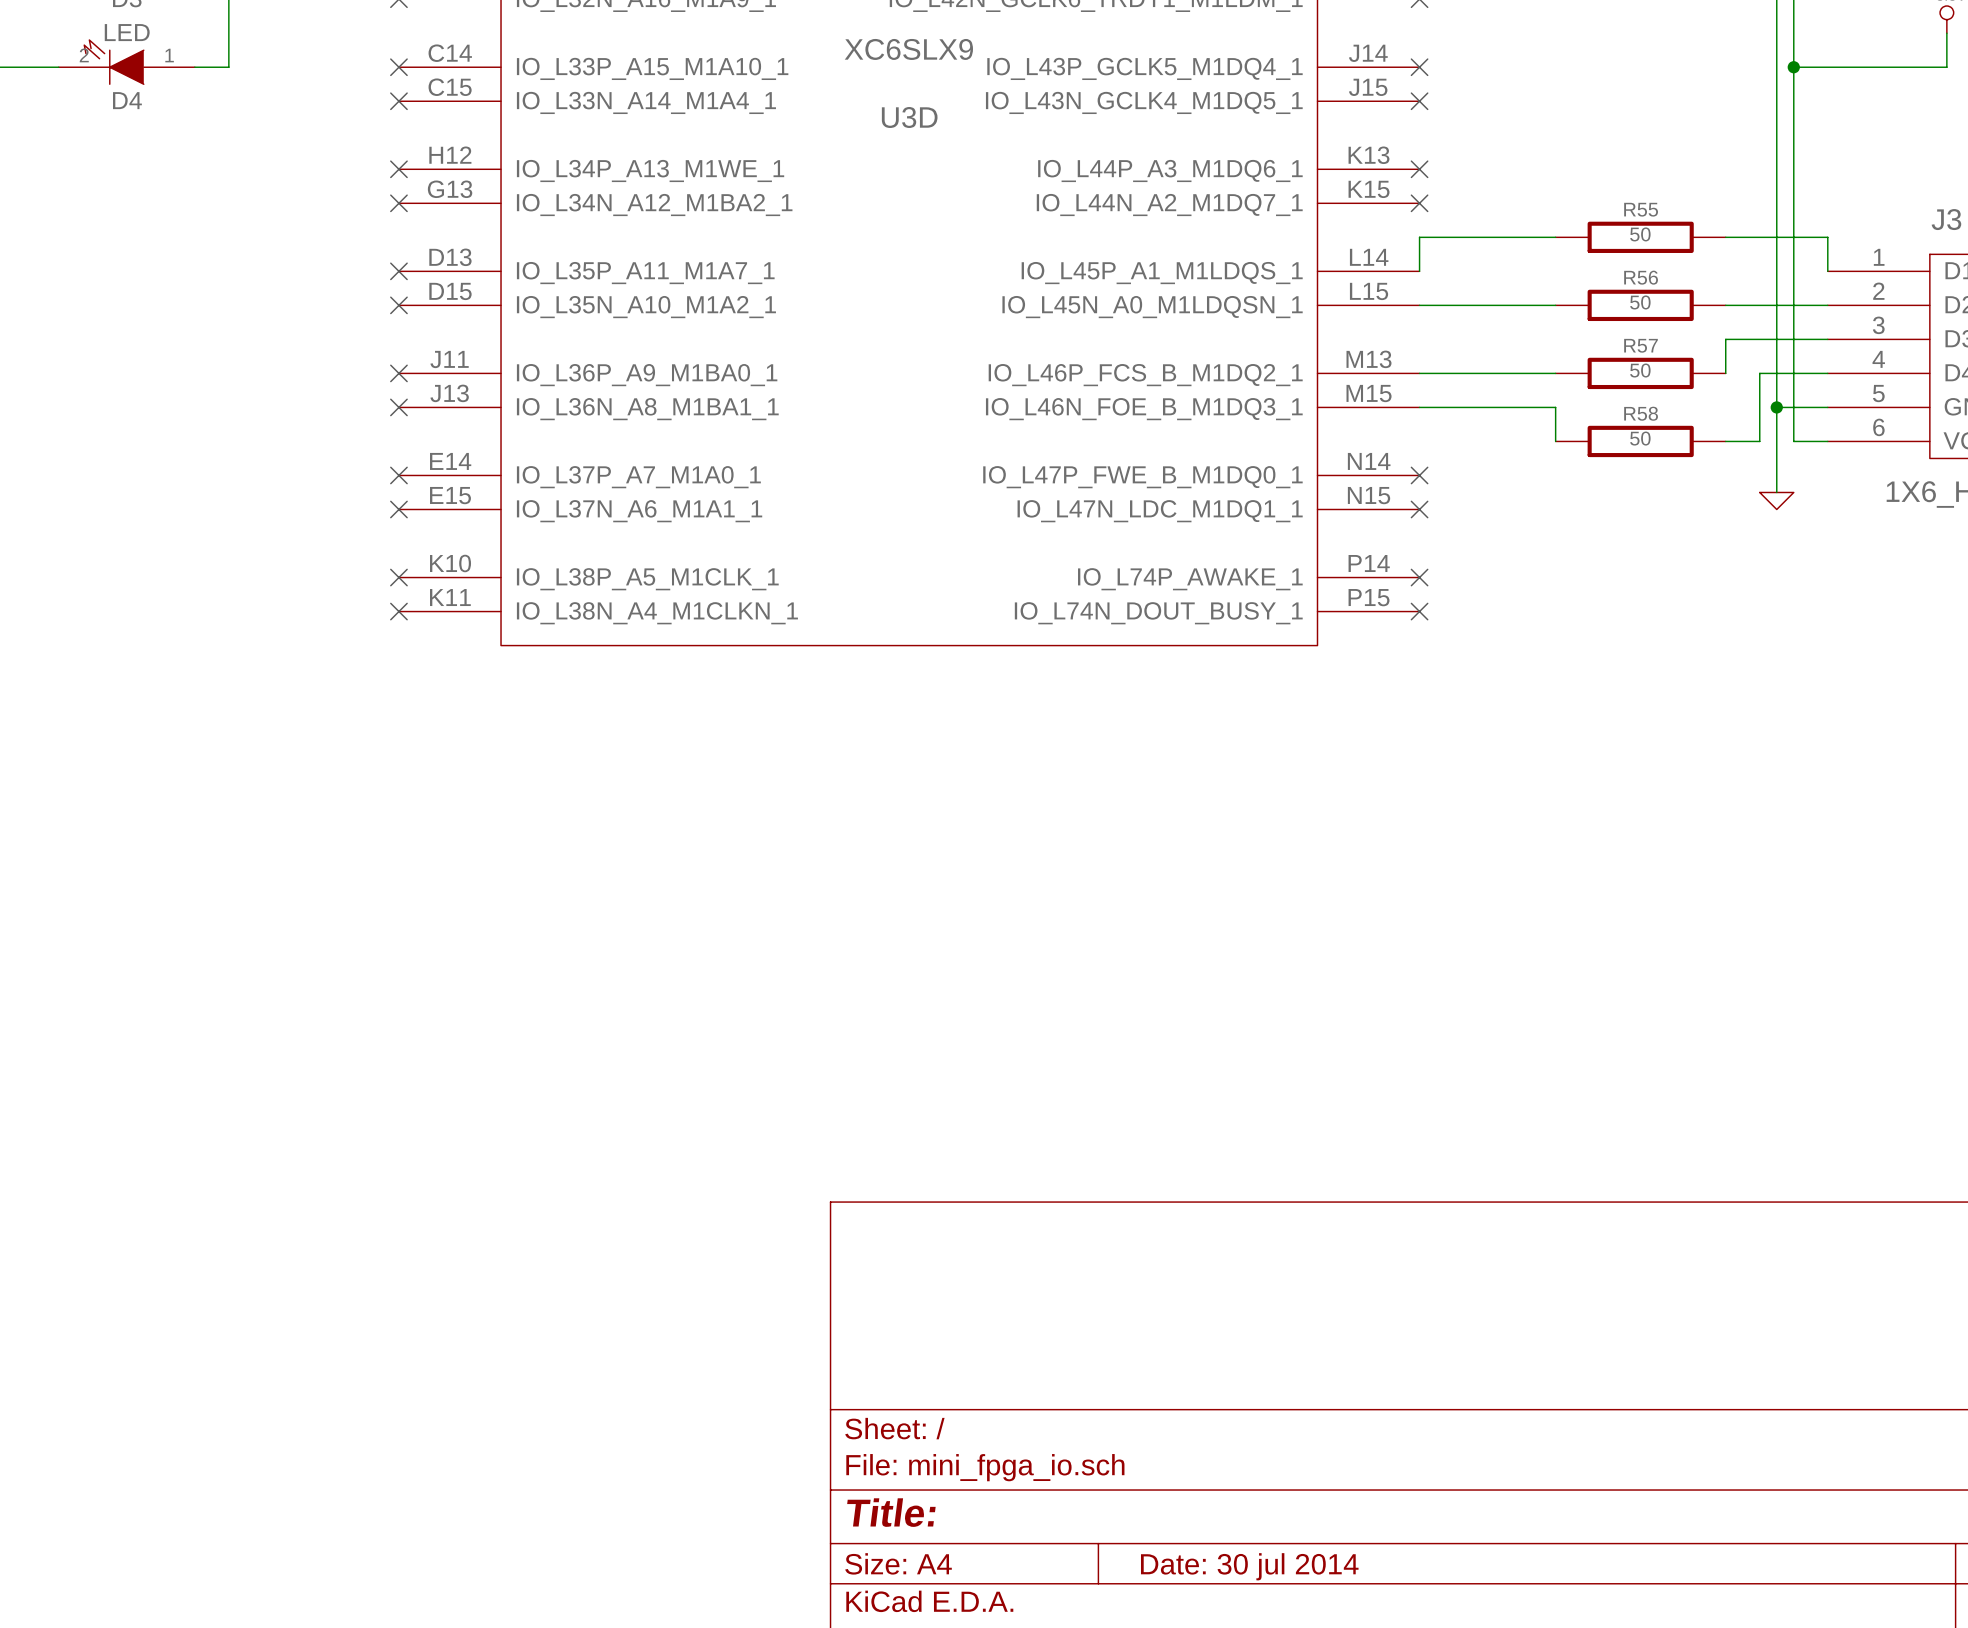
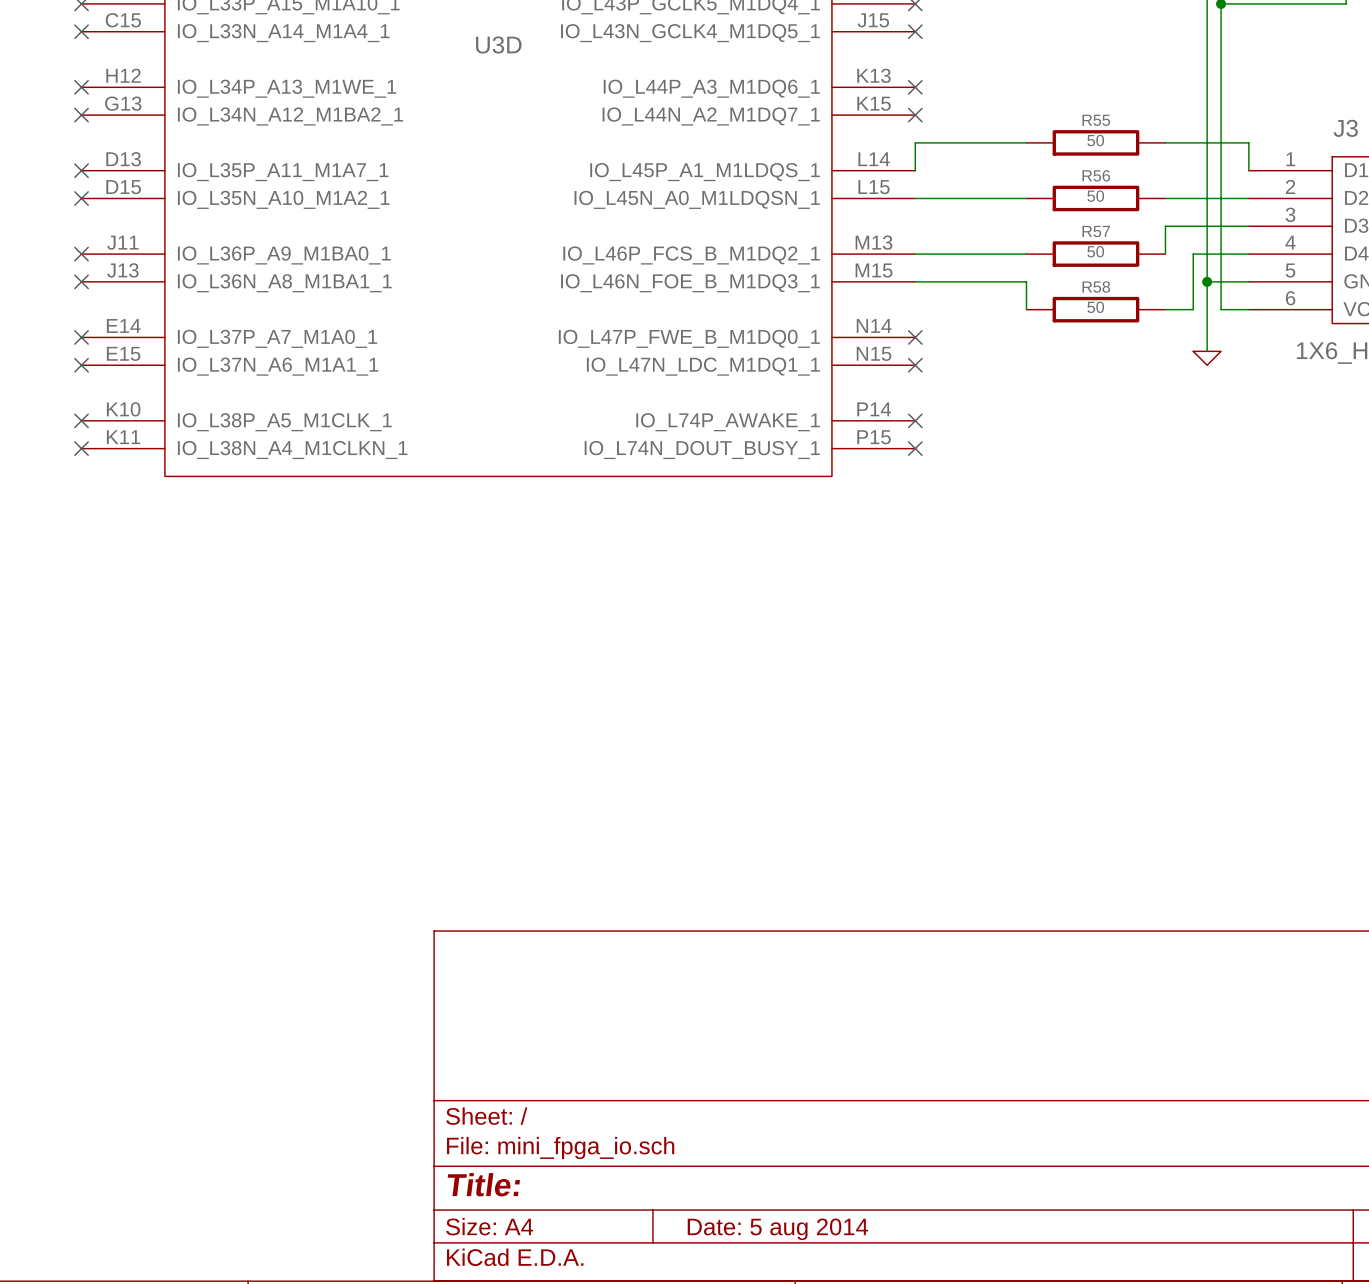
title block: Date: 30 jul 2014 (1249, 1566) -> Date: 5 aug 2014 (777, 1229)

